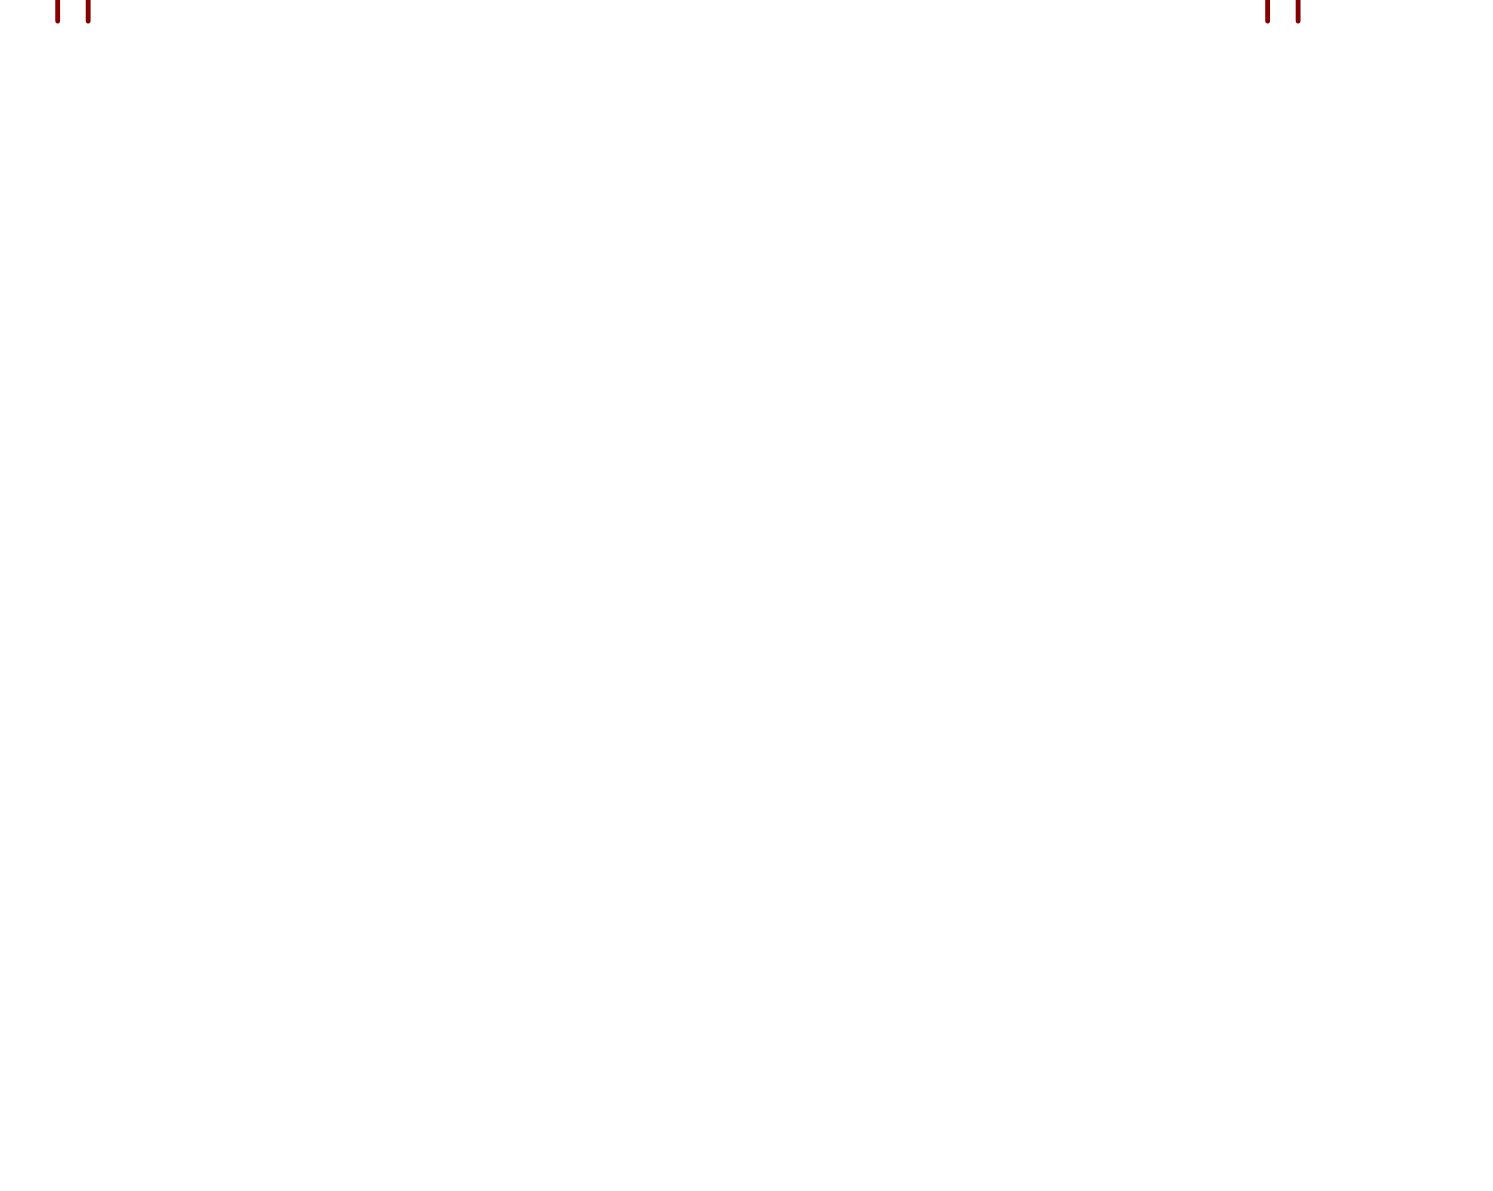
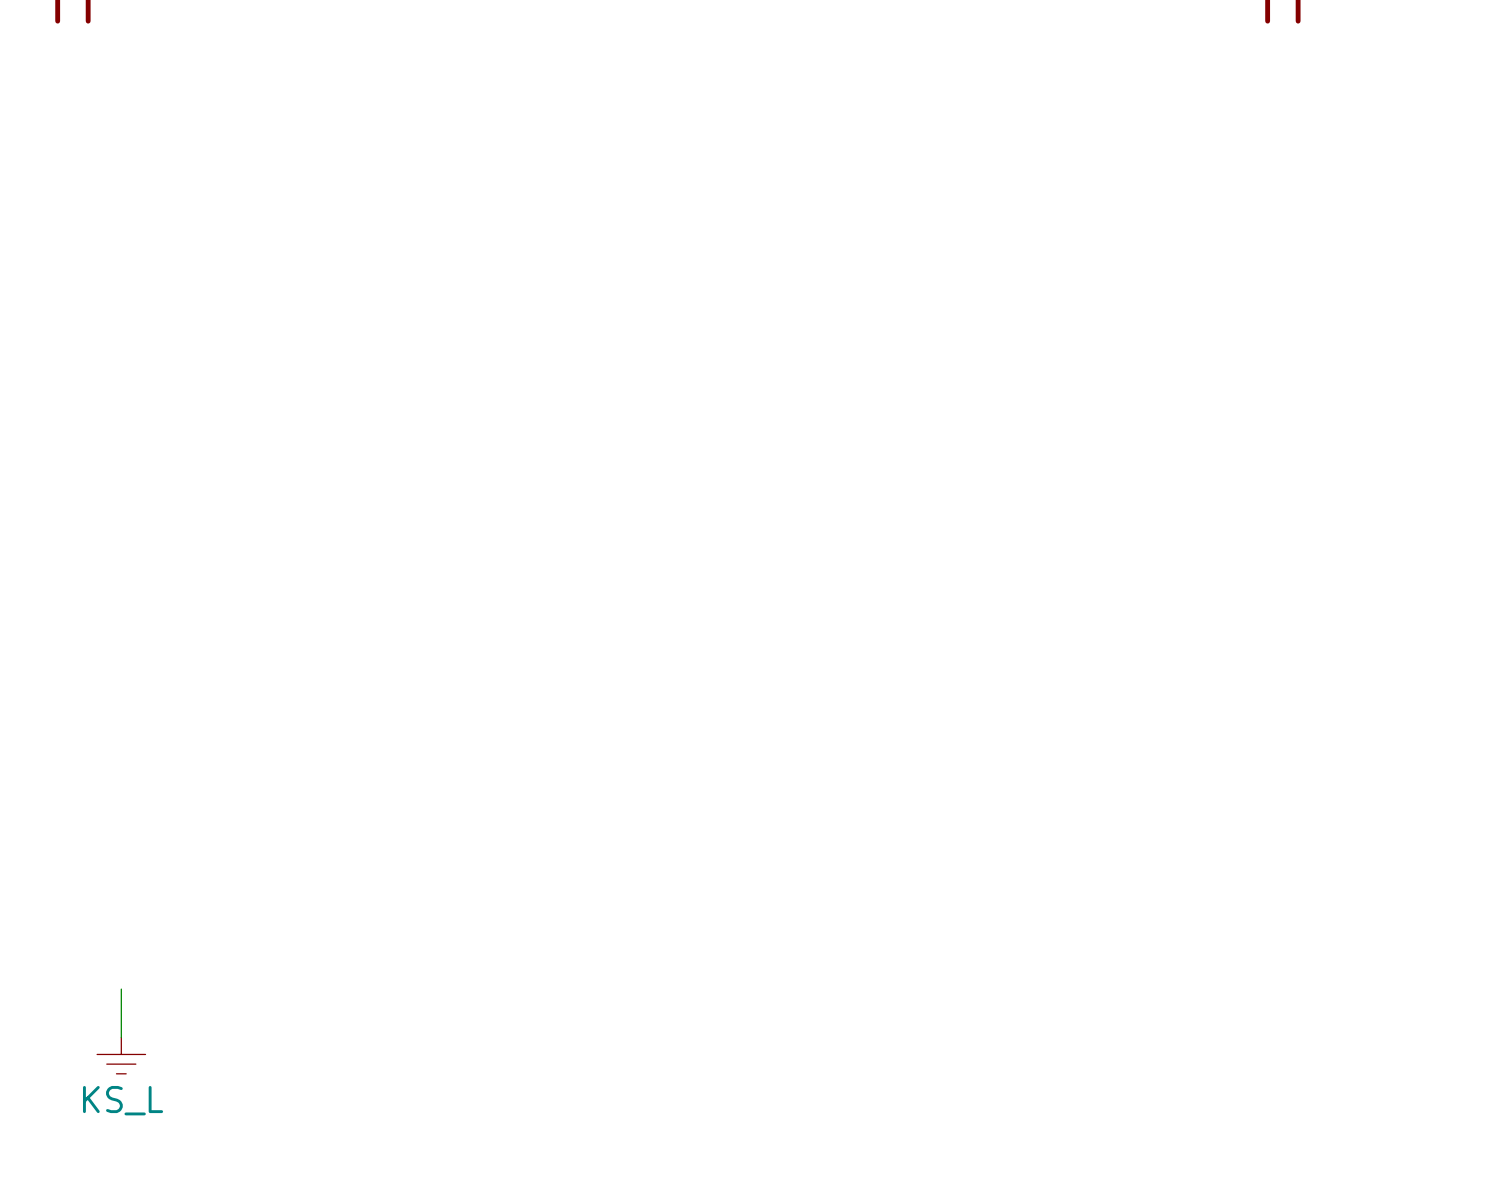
wire: none -> (121, 989) (121, 1037)
power symbol: none -> KS_L (121, 1055)

